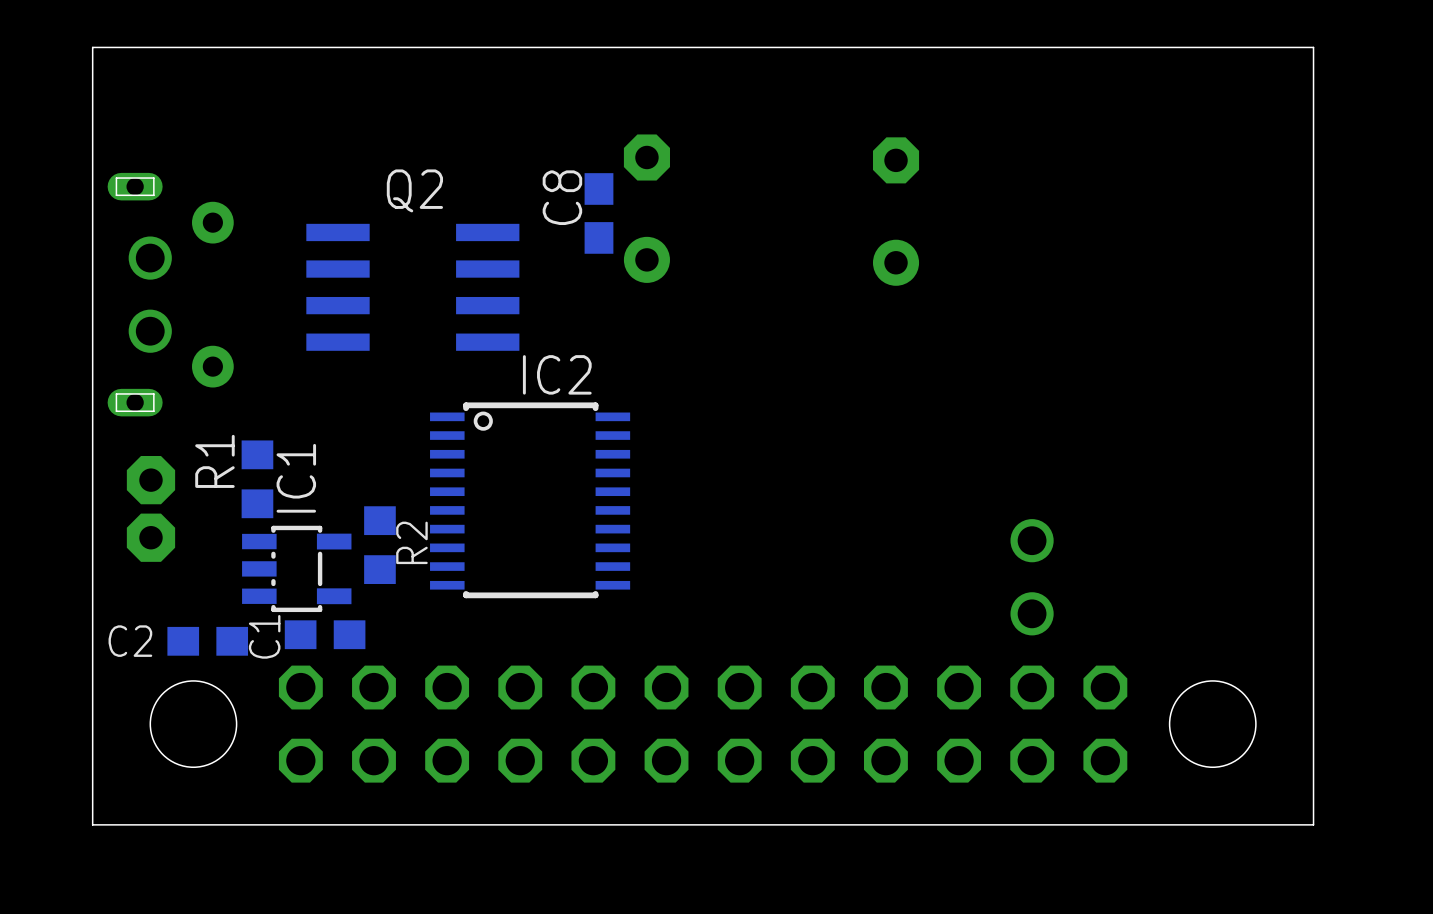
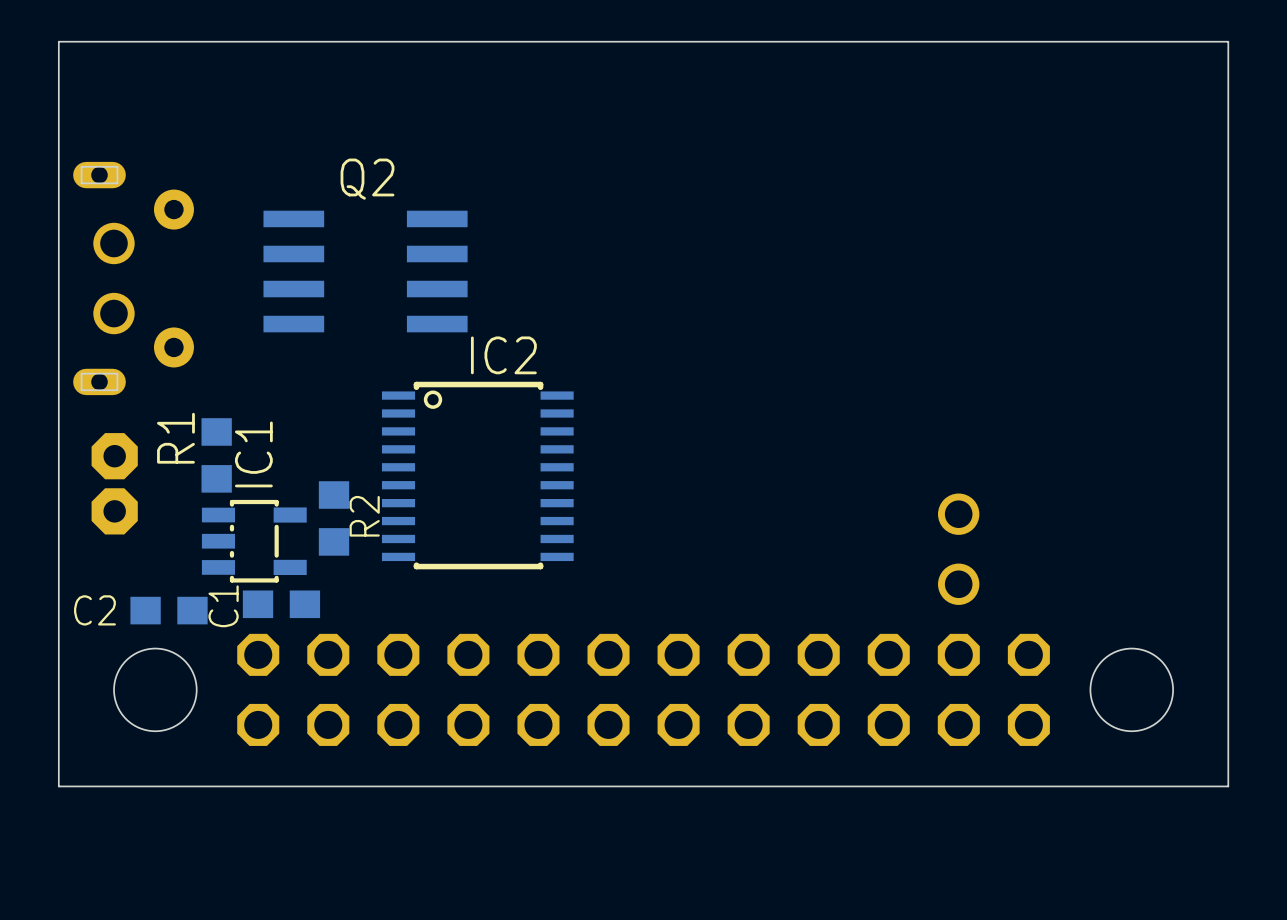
part: (646, 208) -> none
part: (896, 211) -> none
C8: (598, 213) -> none

